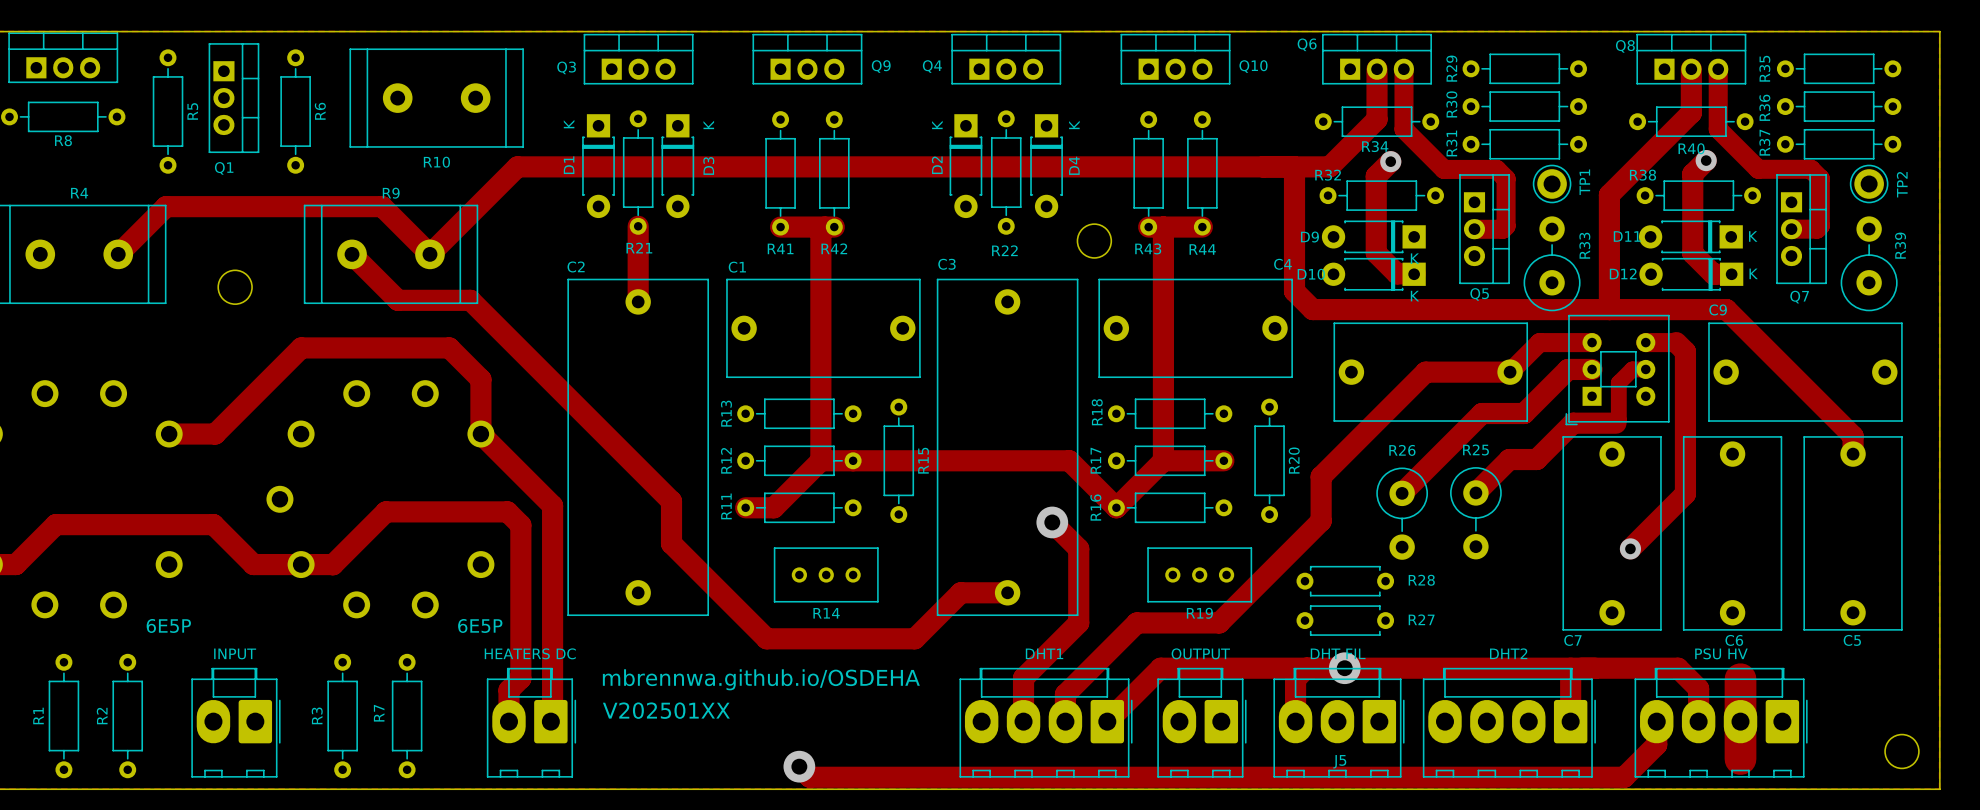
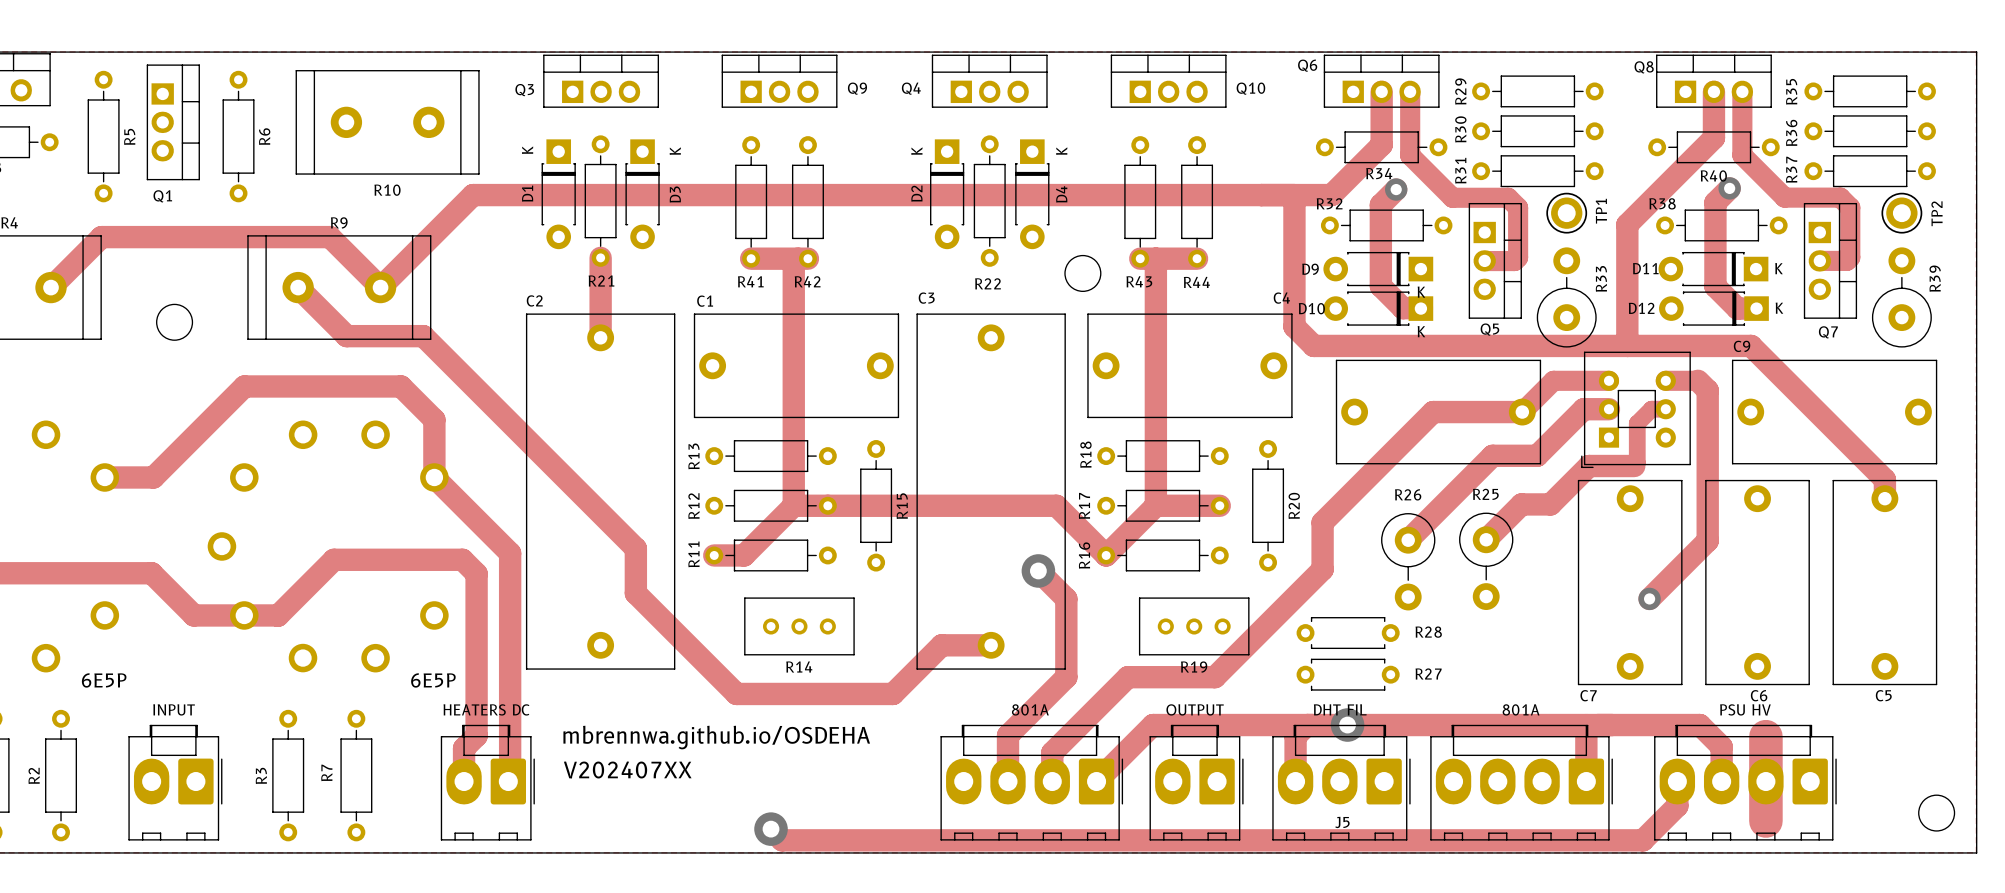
part value: DHT1 (1044, 653) -> 801A (1030, 709)
part value: DHT2 (1508, 653) -> 801A (1521, 709)
text: V202501XX (666, 710) -> V202407XX (627, 770)

